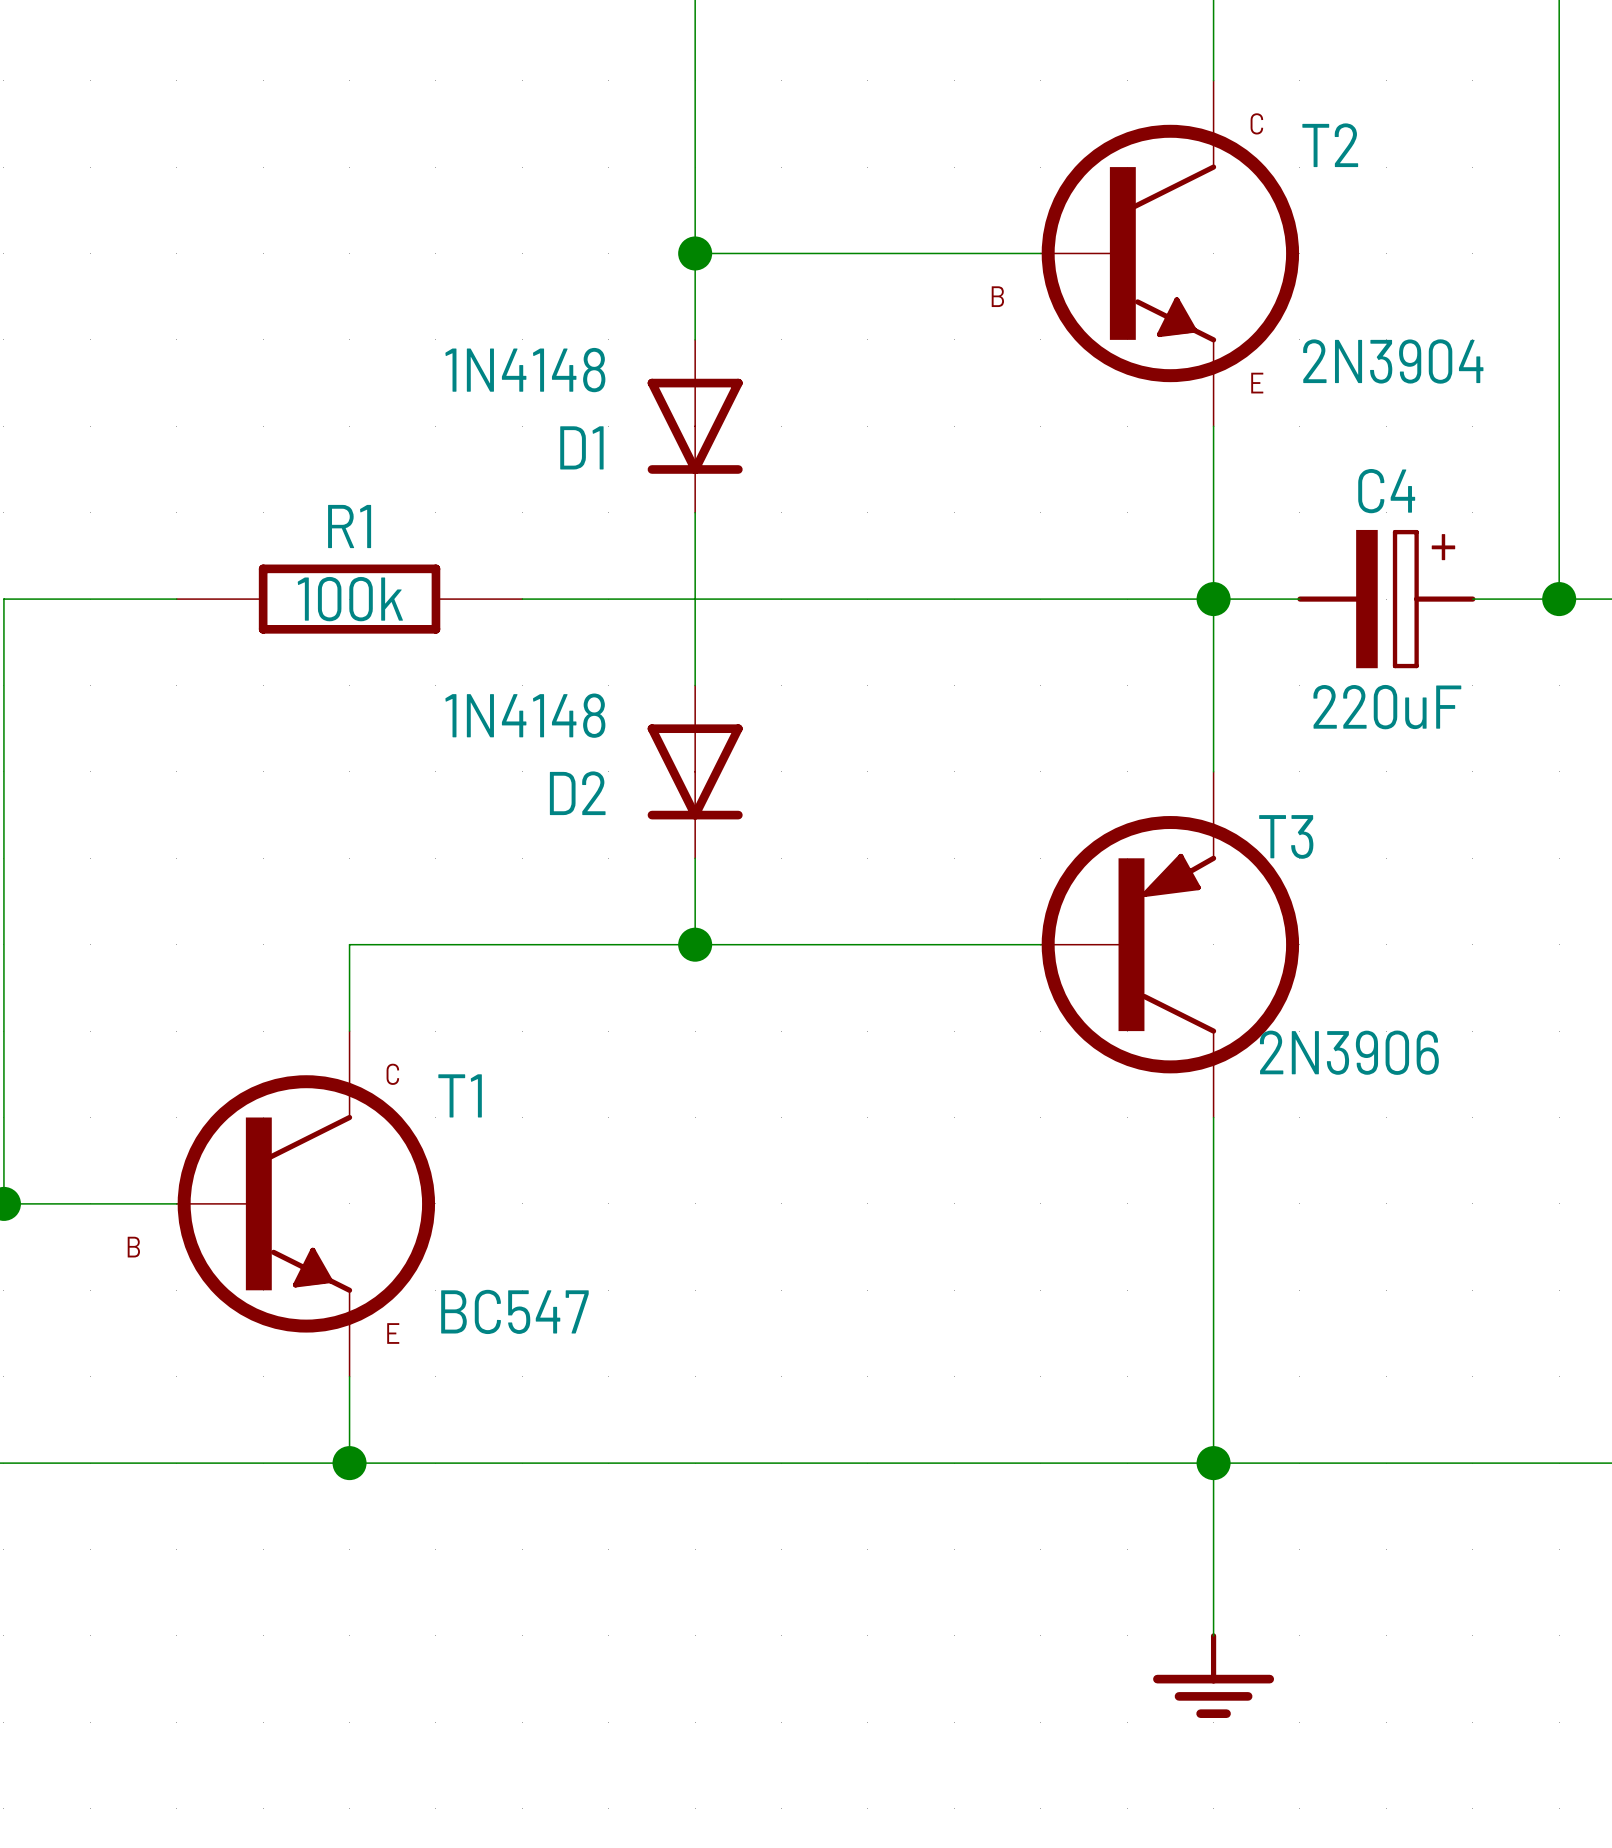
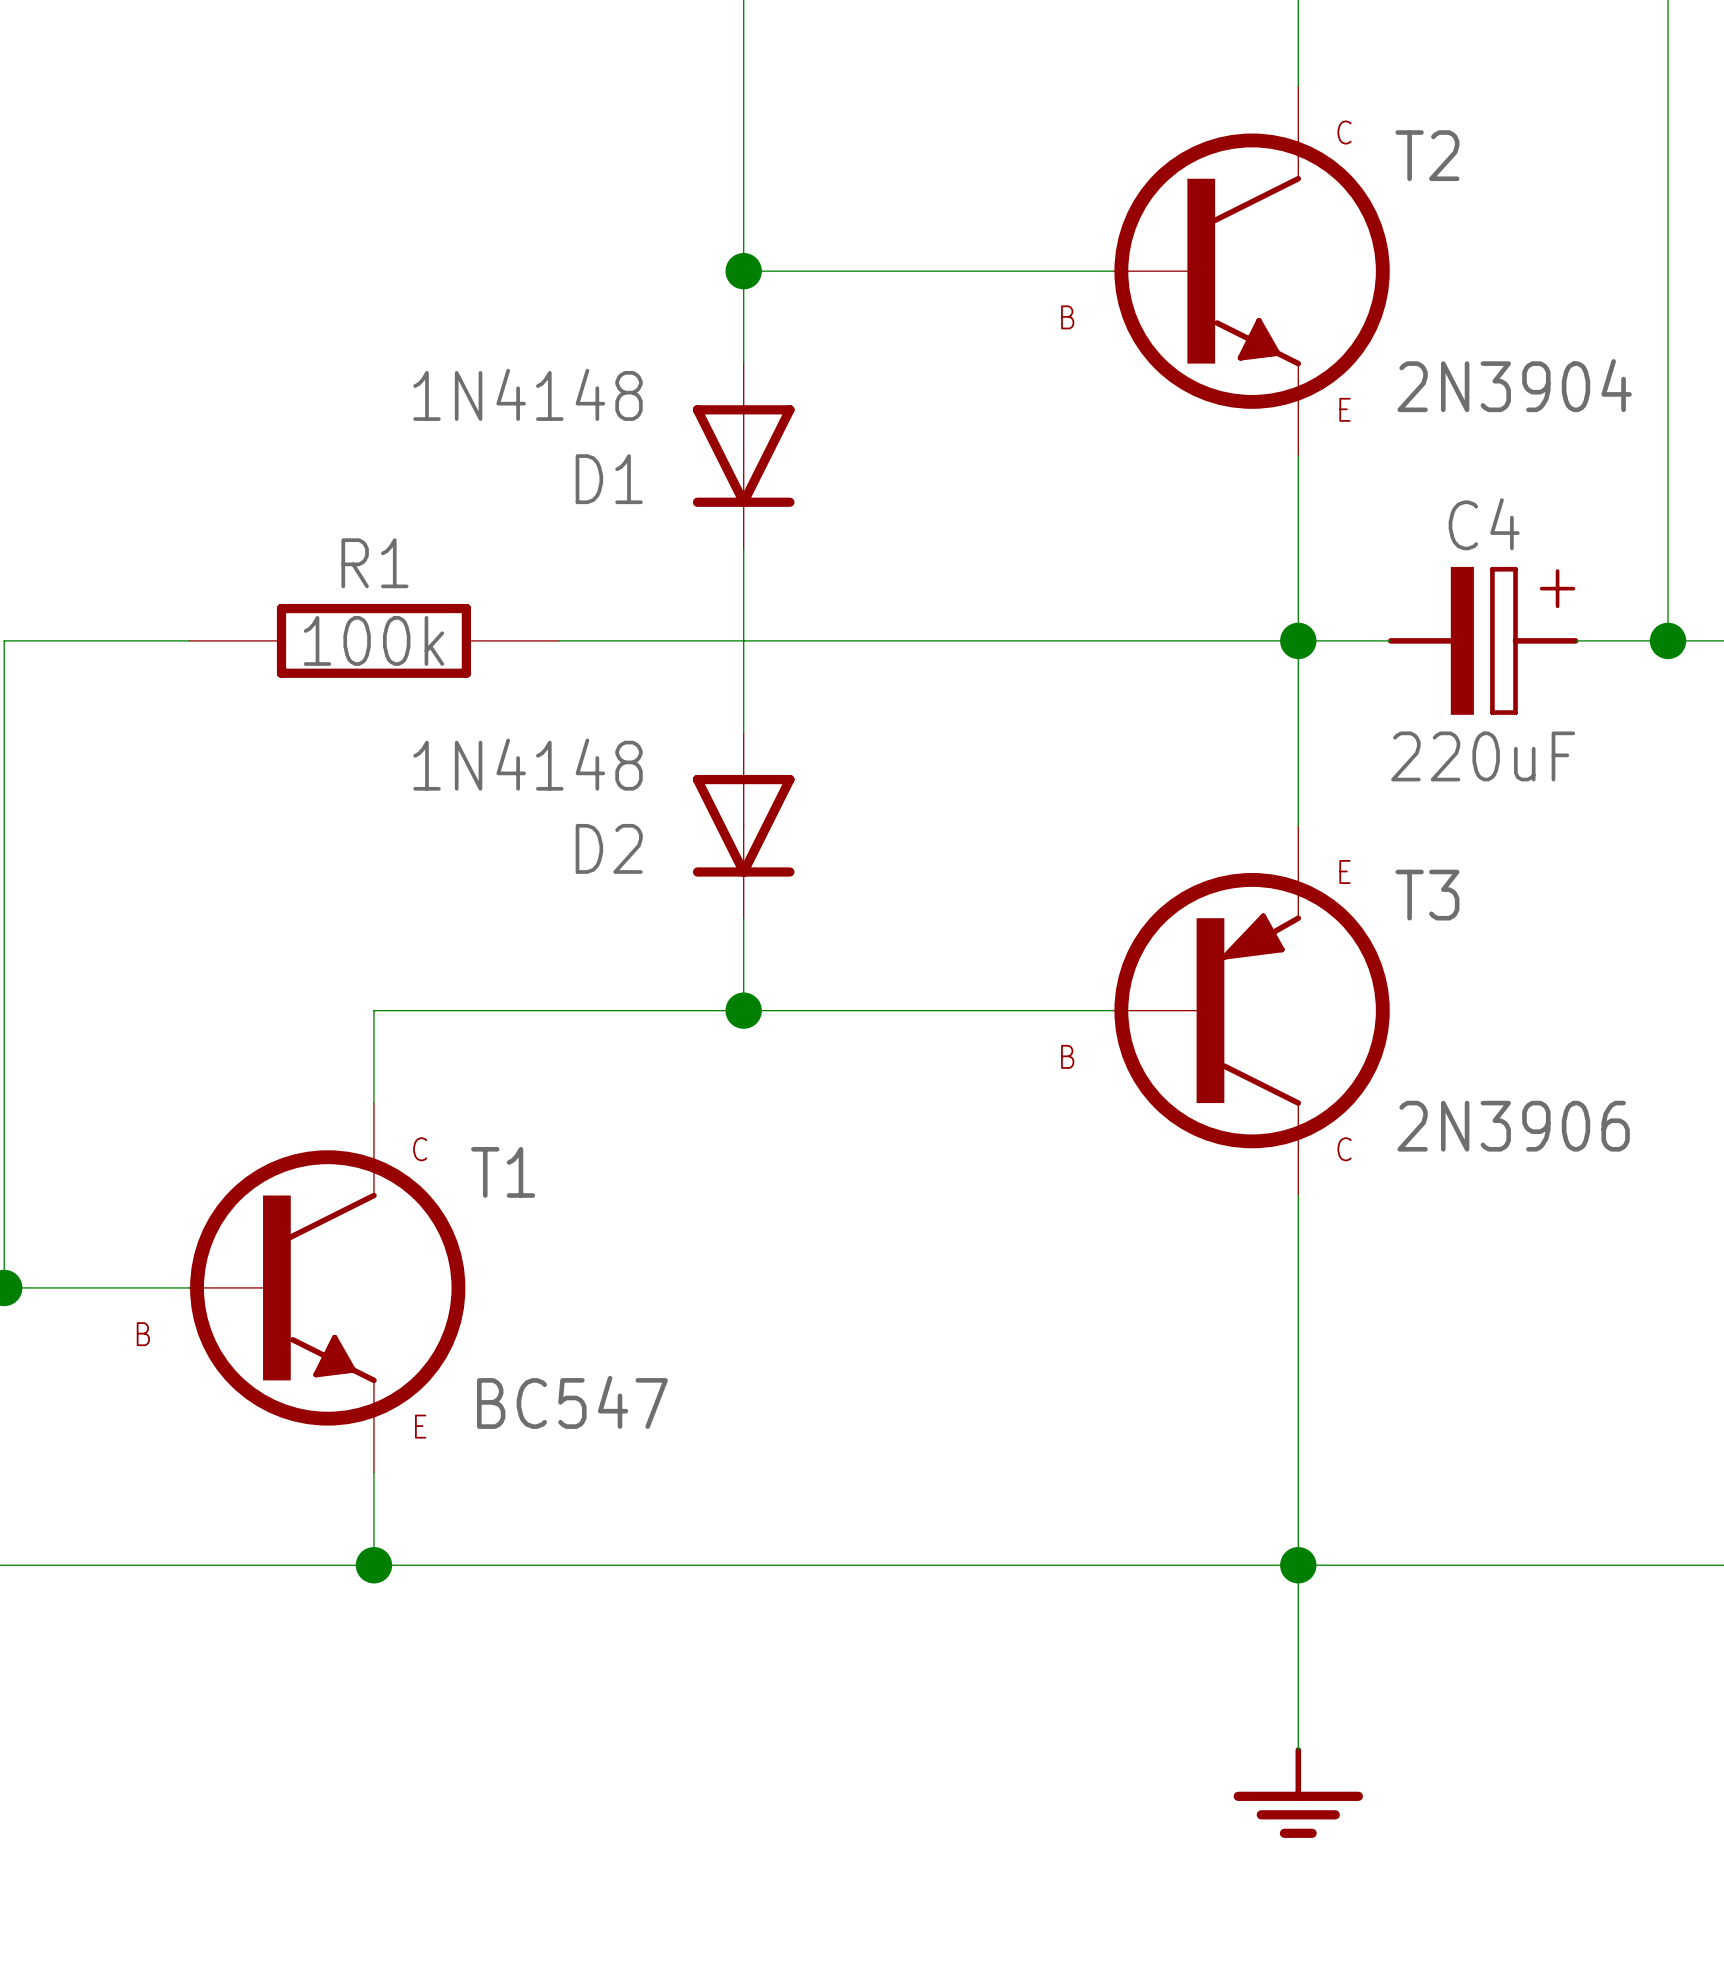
T3 text: none -> E (1344, 871)
T3 name position: T3 (1286, 836) -> T3 (1427, 895)
T3 text: none -> B (1067, 1056)
T3 value position: 2N3906 (1349, 1052) -> 2N3906 (1513, 1126)
T3 text: none -> C (1344, 1149)

